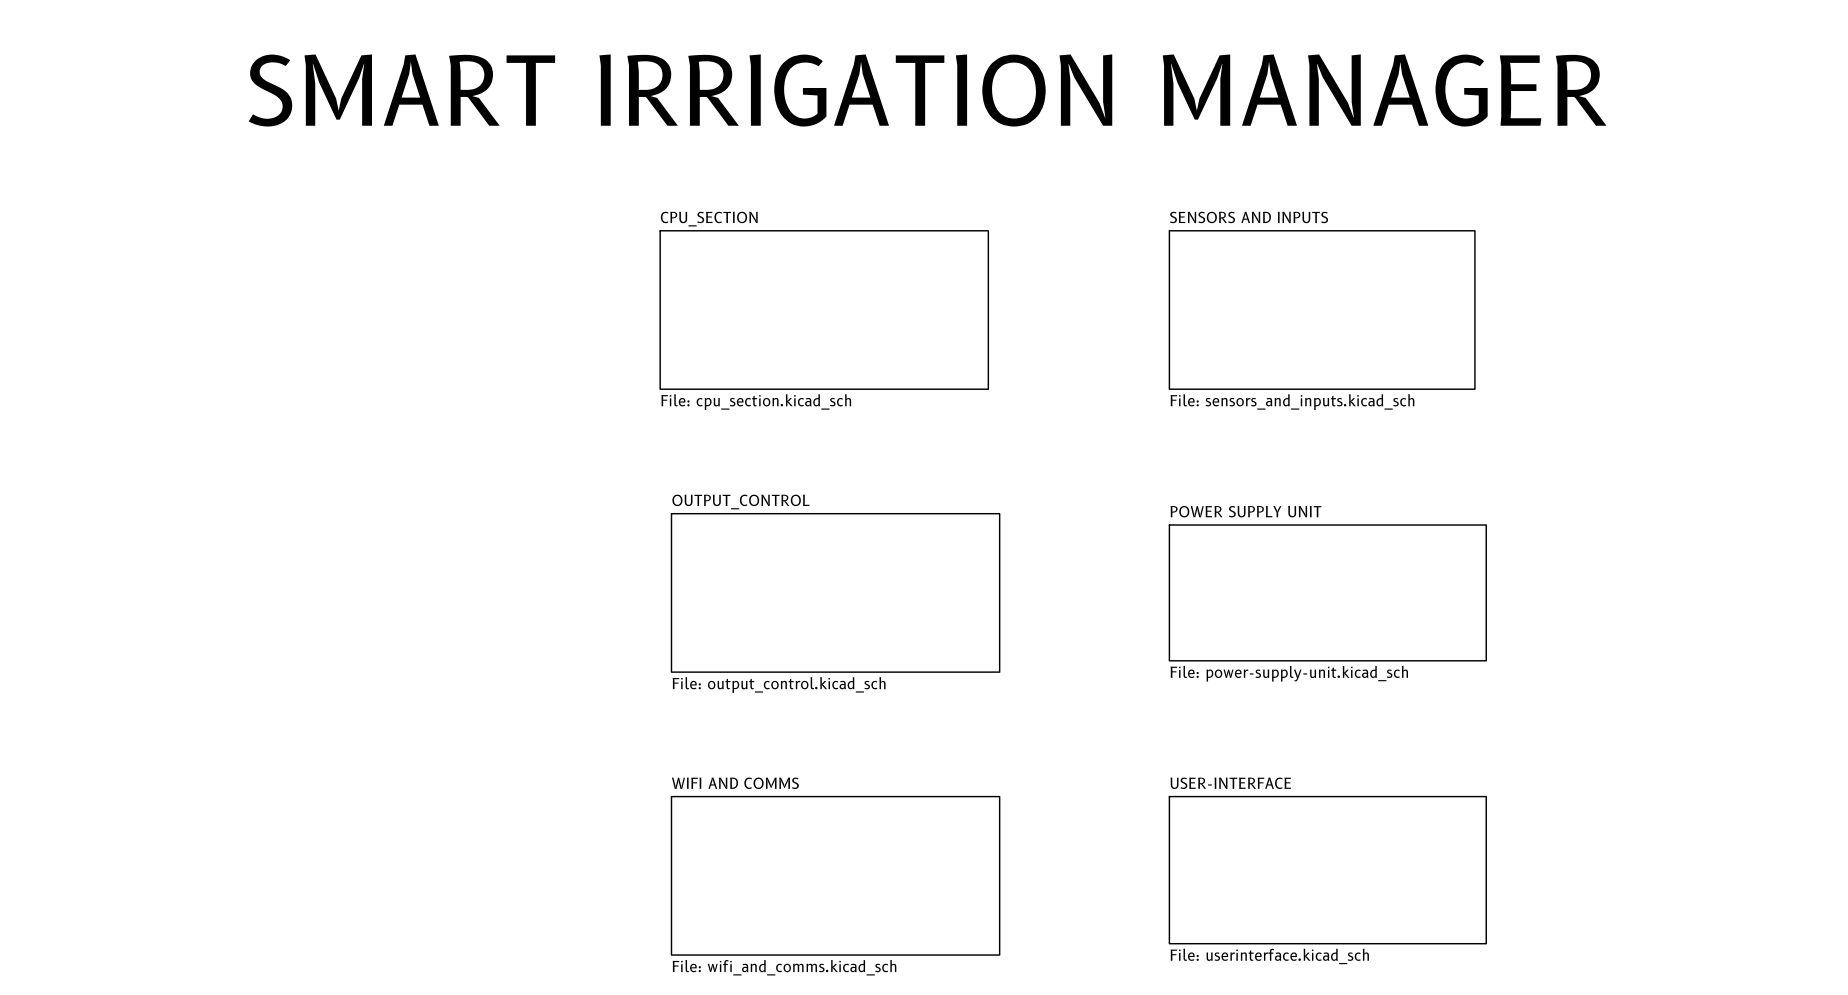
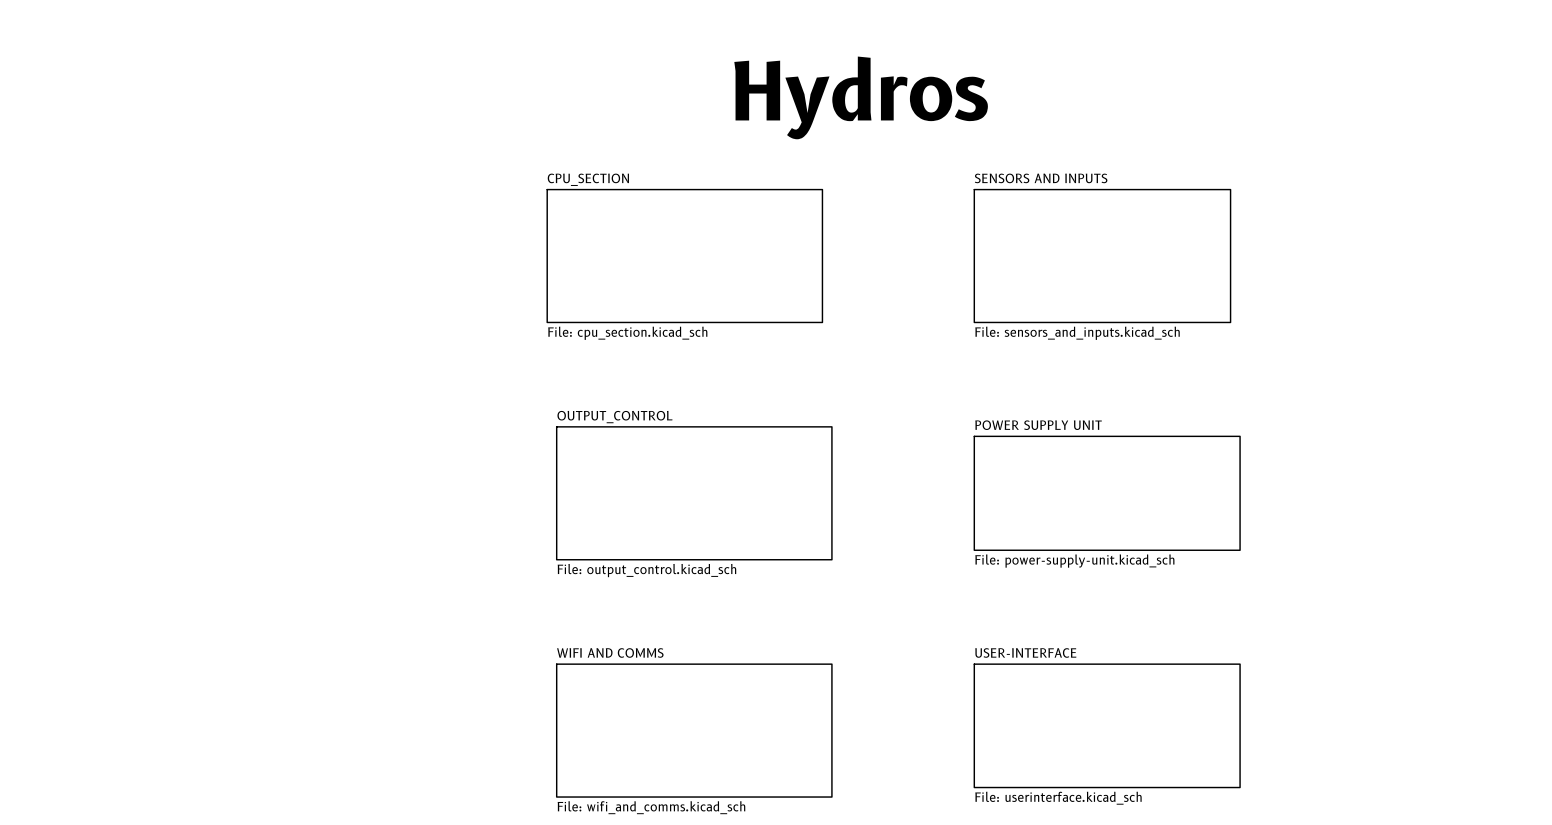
text: SMART IRRIGATION MANAGER (927, 90) -> none
text: none -> Hydros (861, 97)

